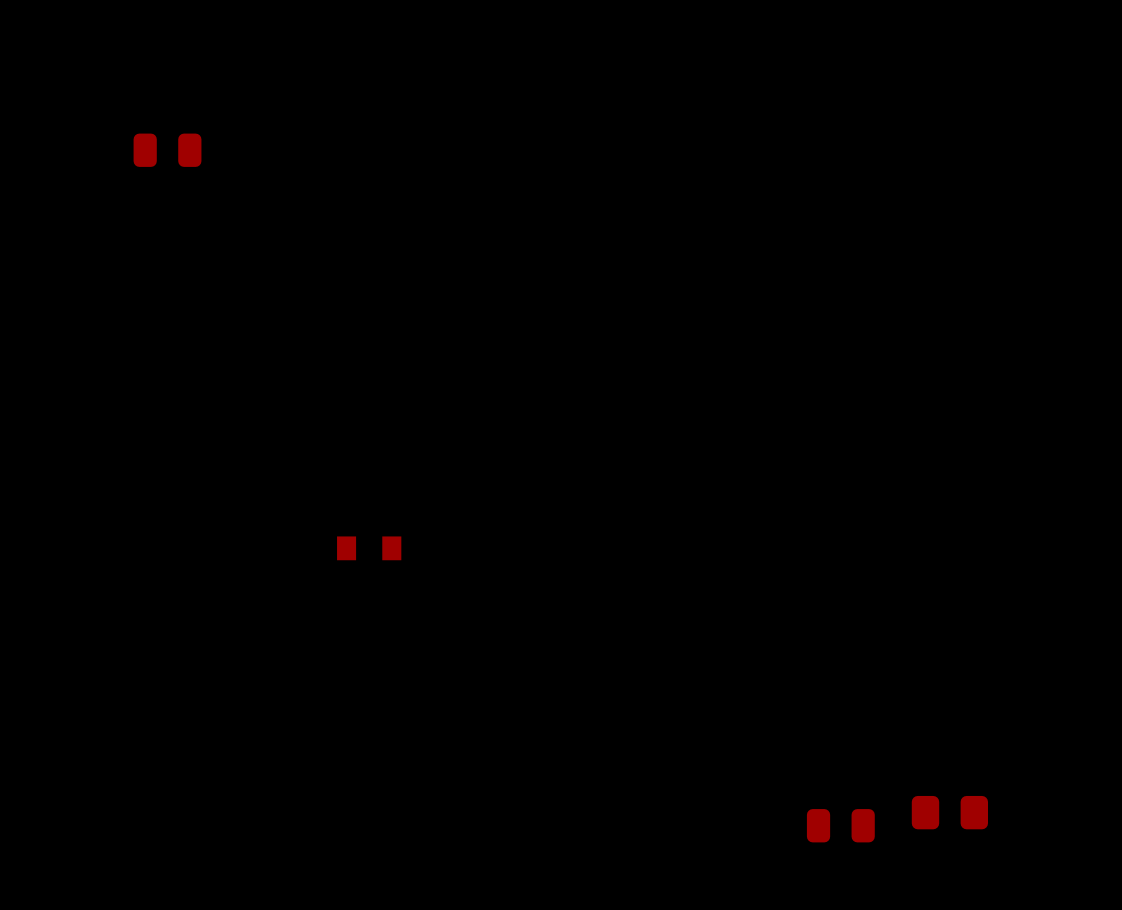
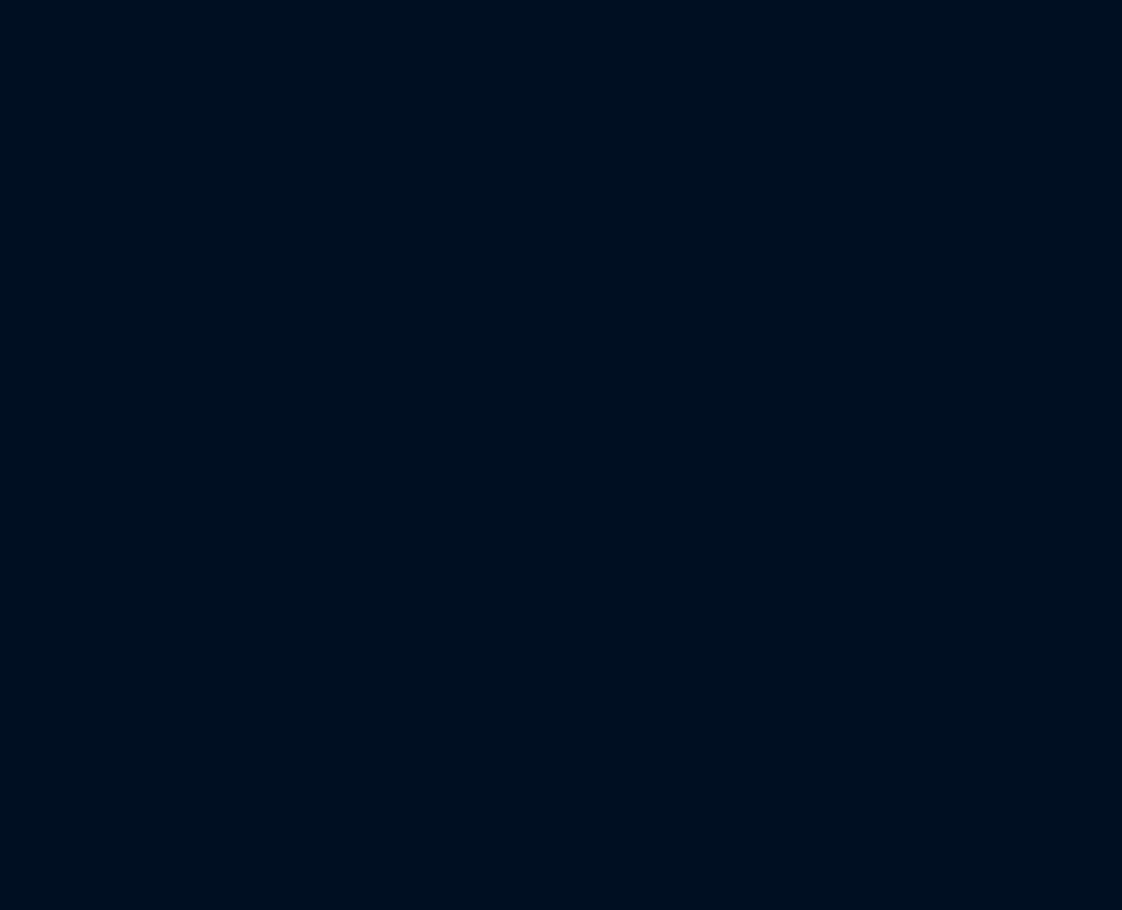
part: (167, 150) -> none
part: (369, 548) -> none
part: (949, 812) -> none
part: (840, 825) -> none

